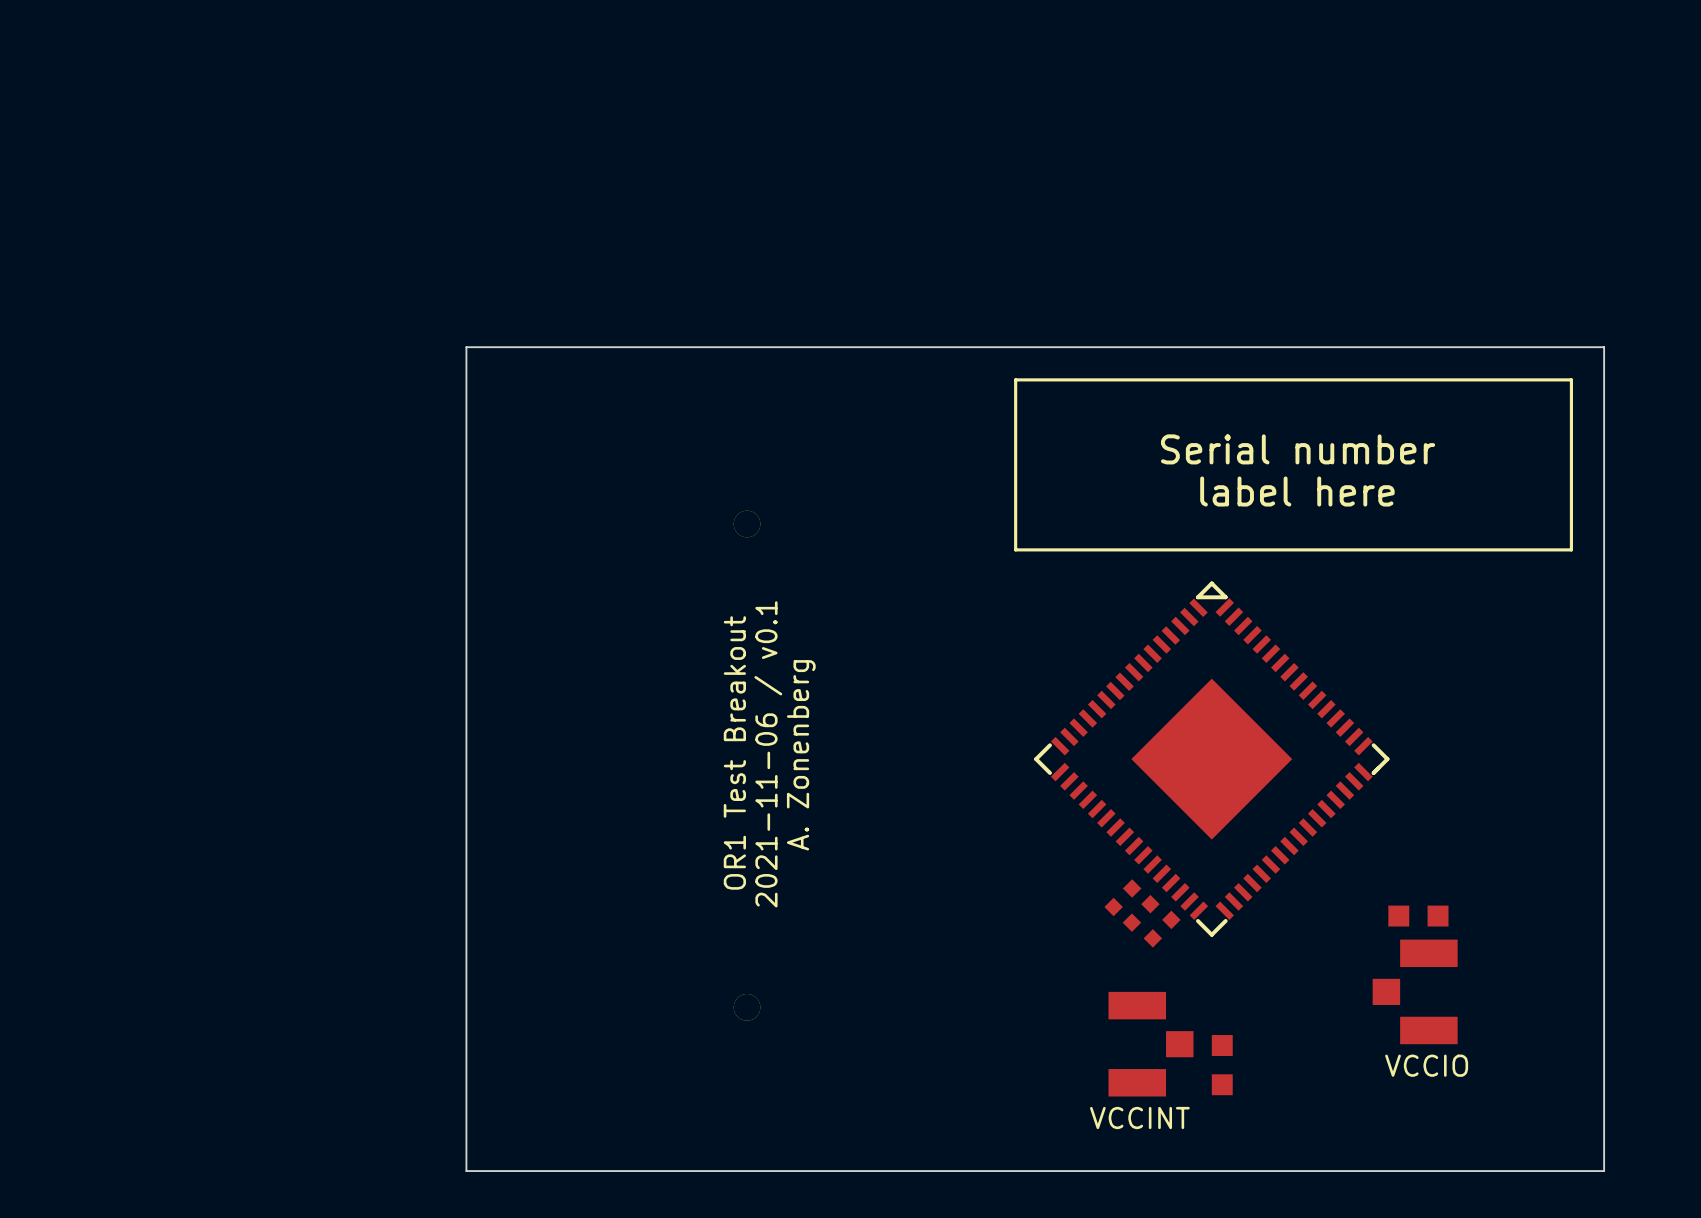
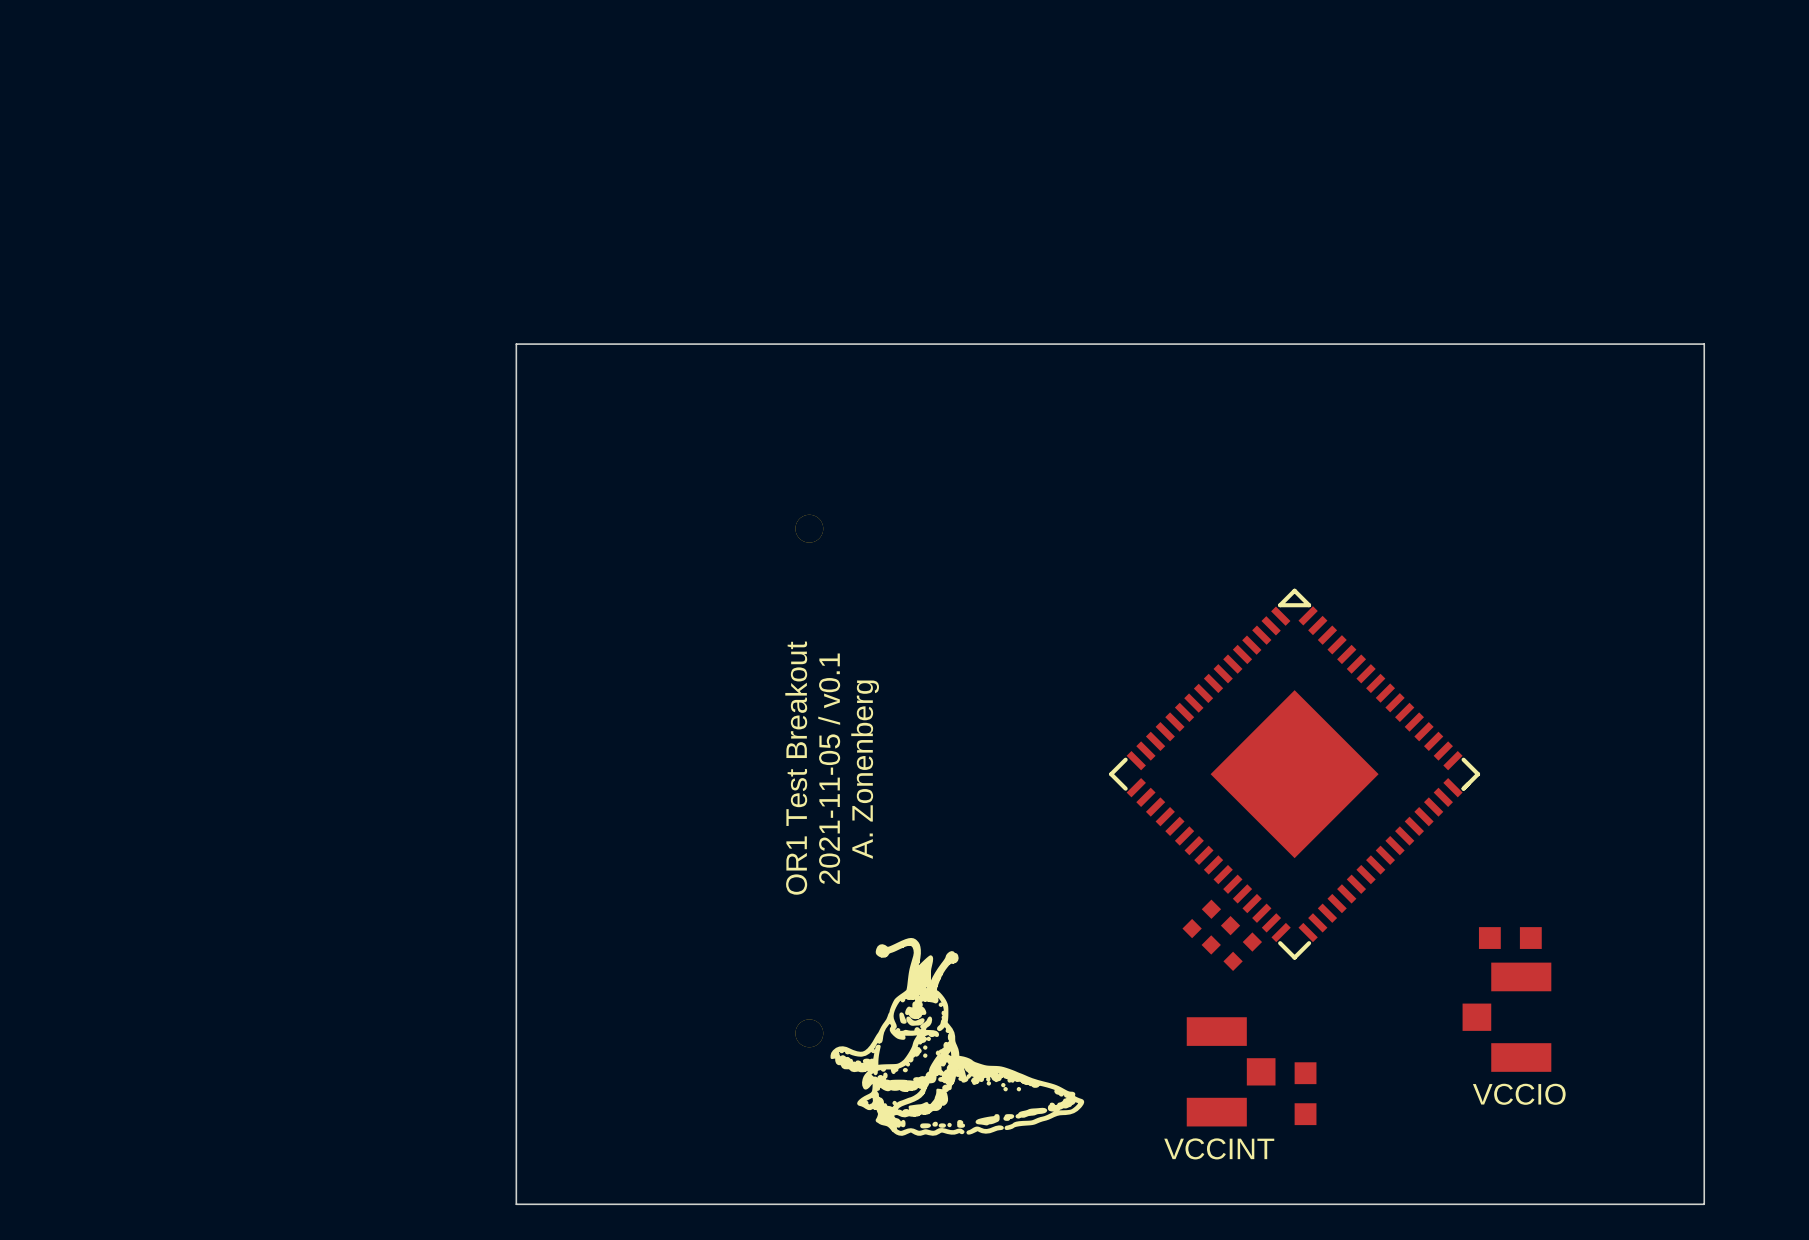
line: (1015, 379) (1015, 549) (1571, 549) (1571, 379) (1015, 379) -> none
text: Serial number (1298, 449) -> none
text: label here (1297, 491) -> none
text: 2021-11-06 / v0.1 (768, 754) -> 2021-11-05 / v0.1 (829, 768)
drawing: none -> [830, 937, 1085, 1136]

